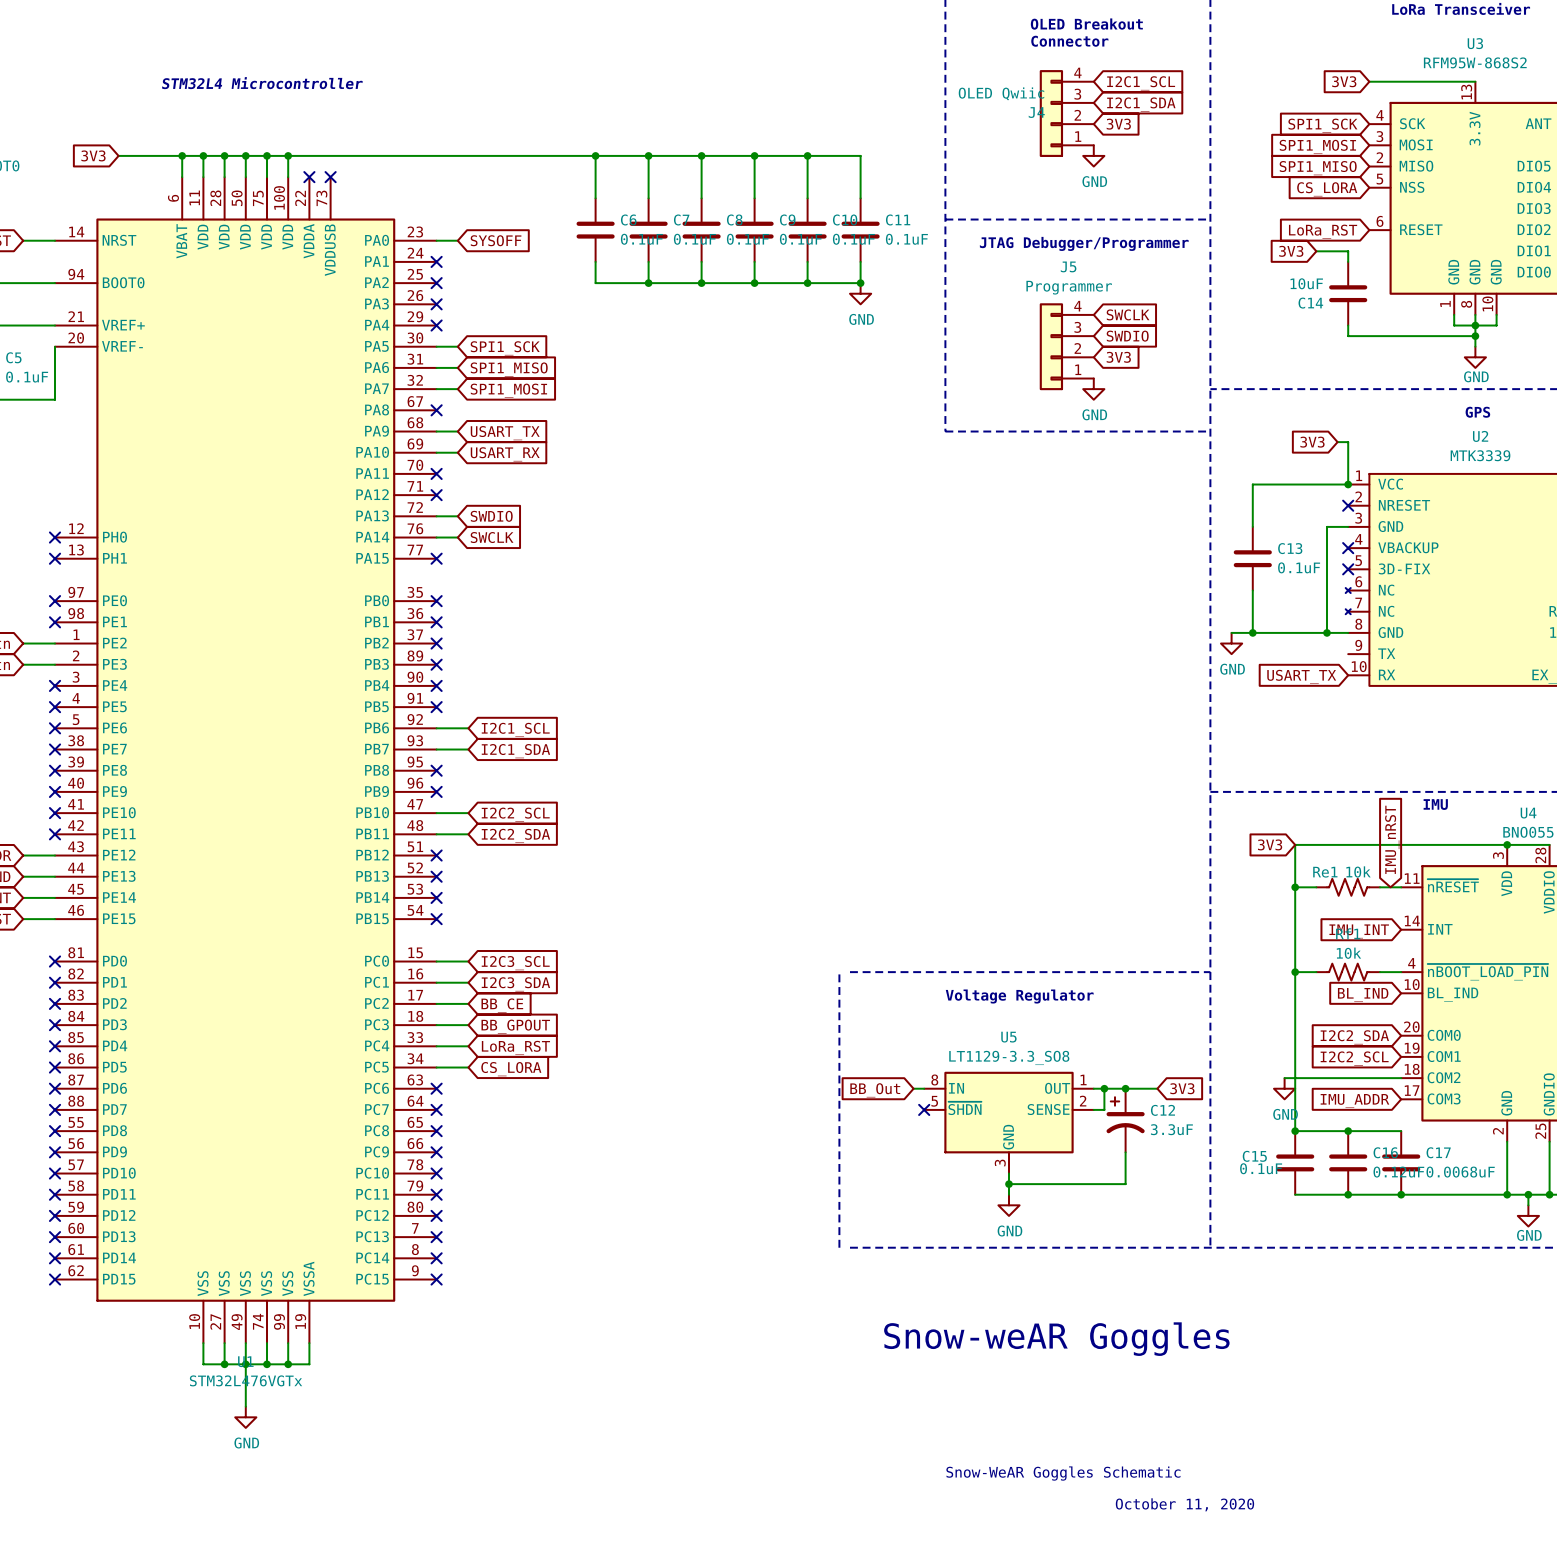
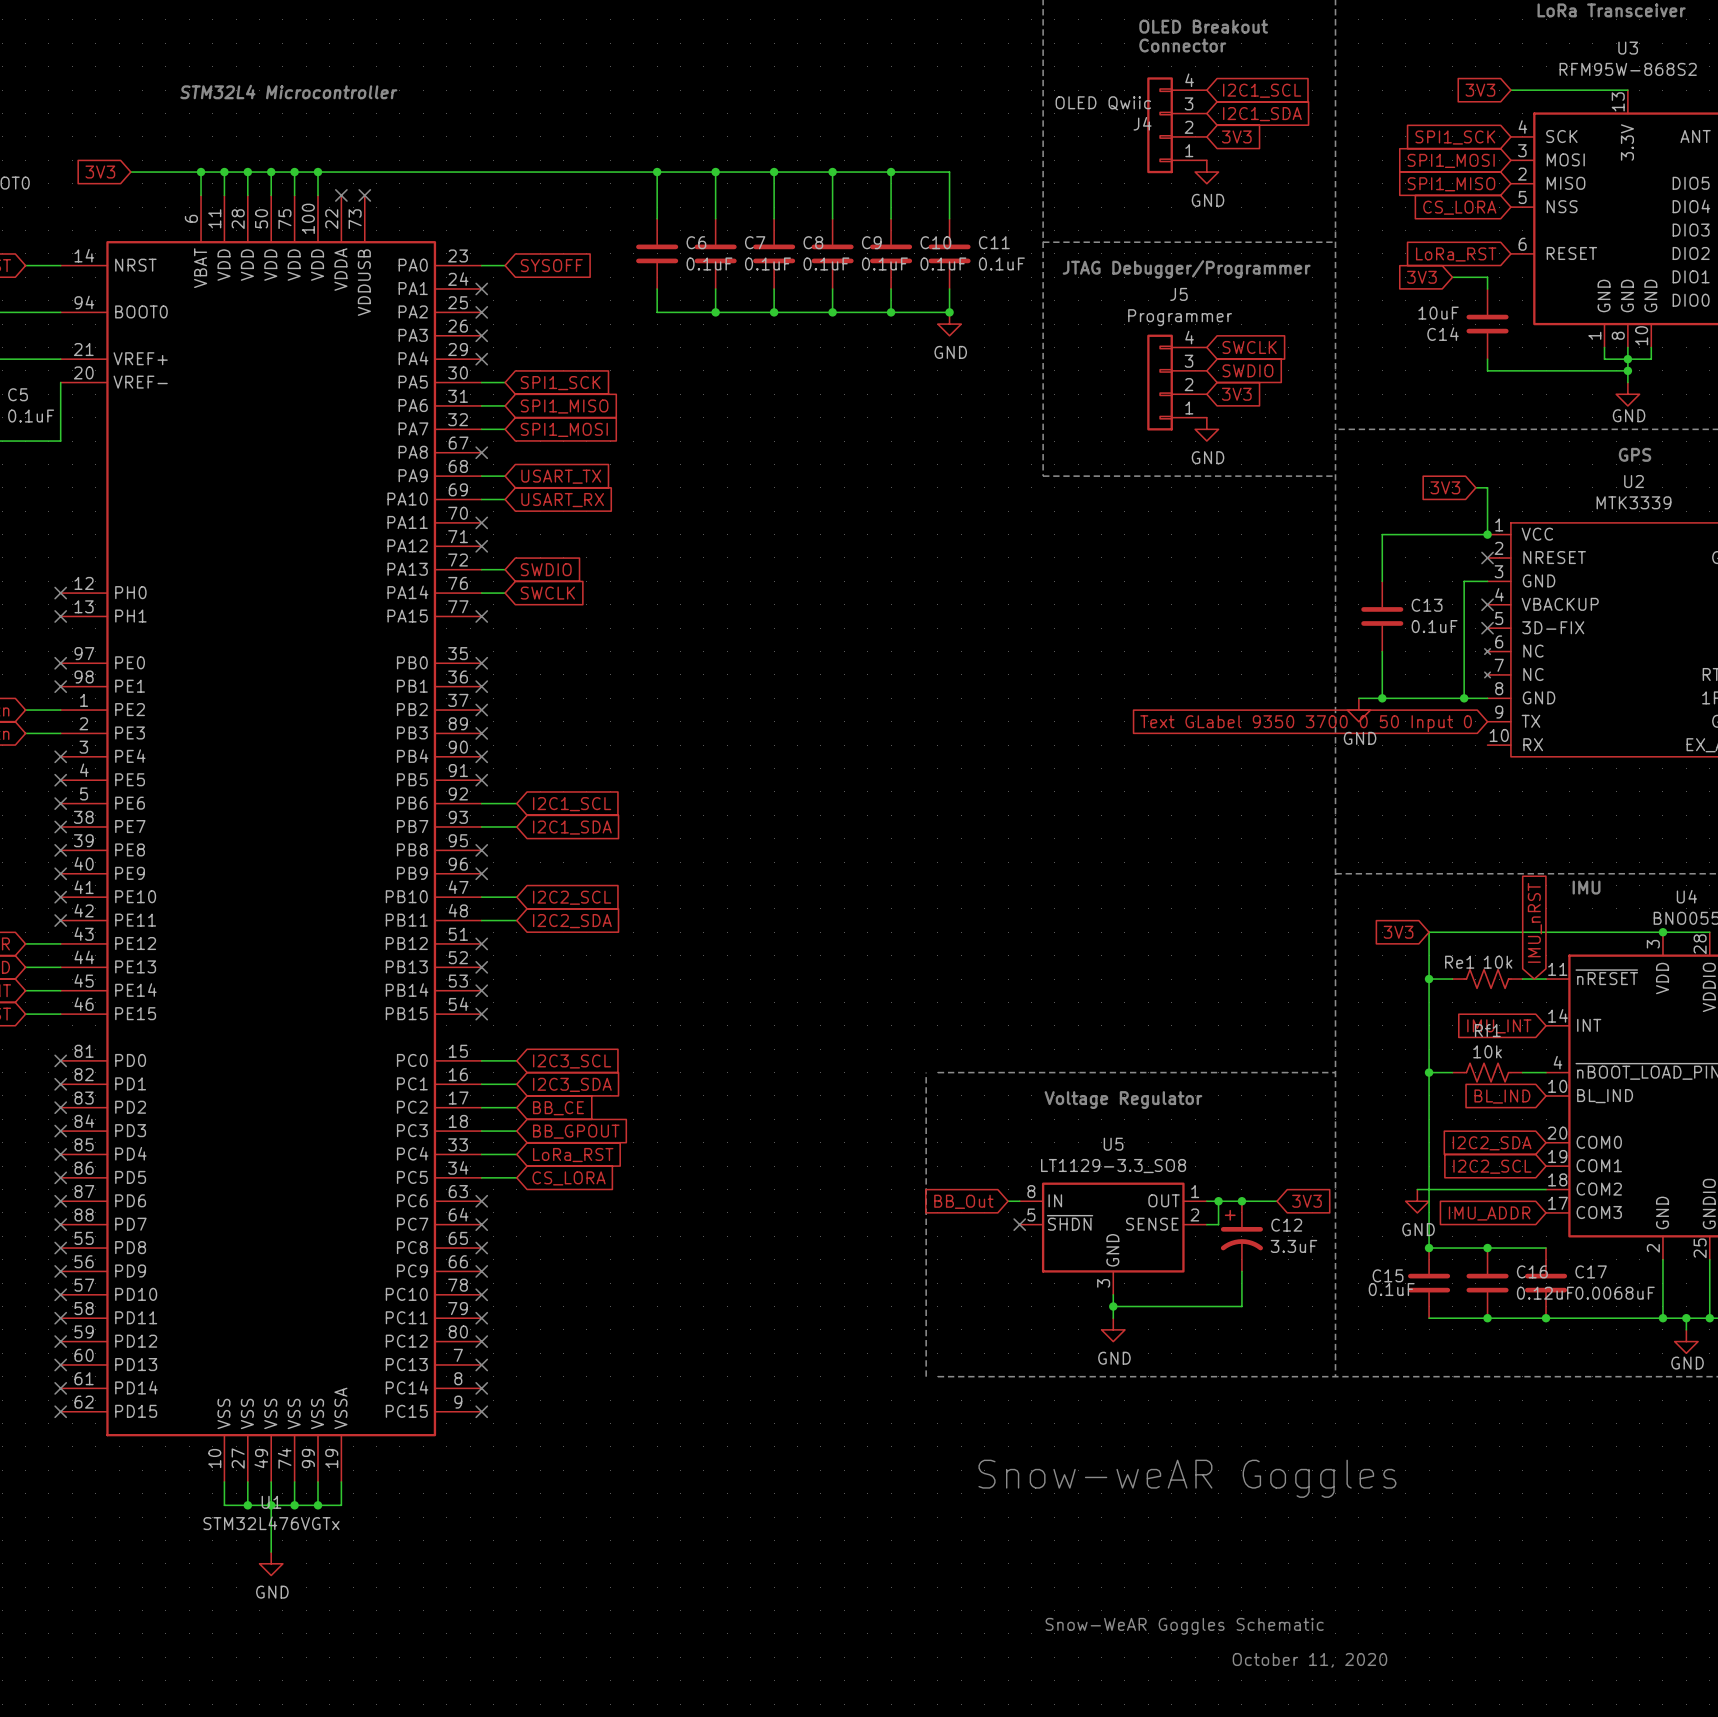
global label: none -> Text GLabel 9350 3700 0 50 Input 0 (1306, 723)
global label: USART_TX (1301, 676) -> none

